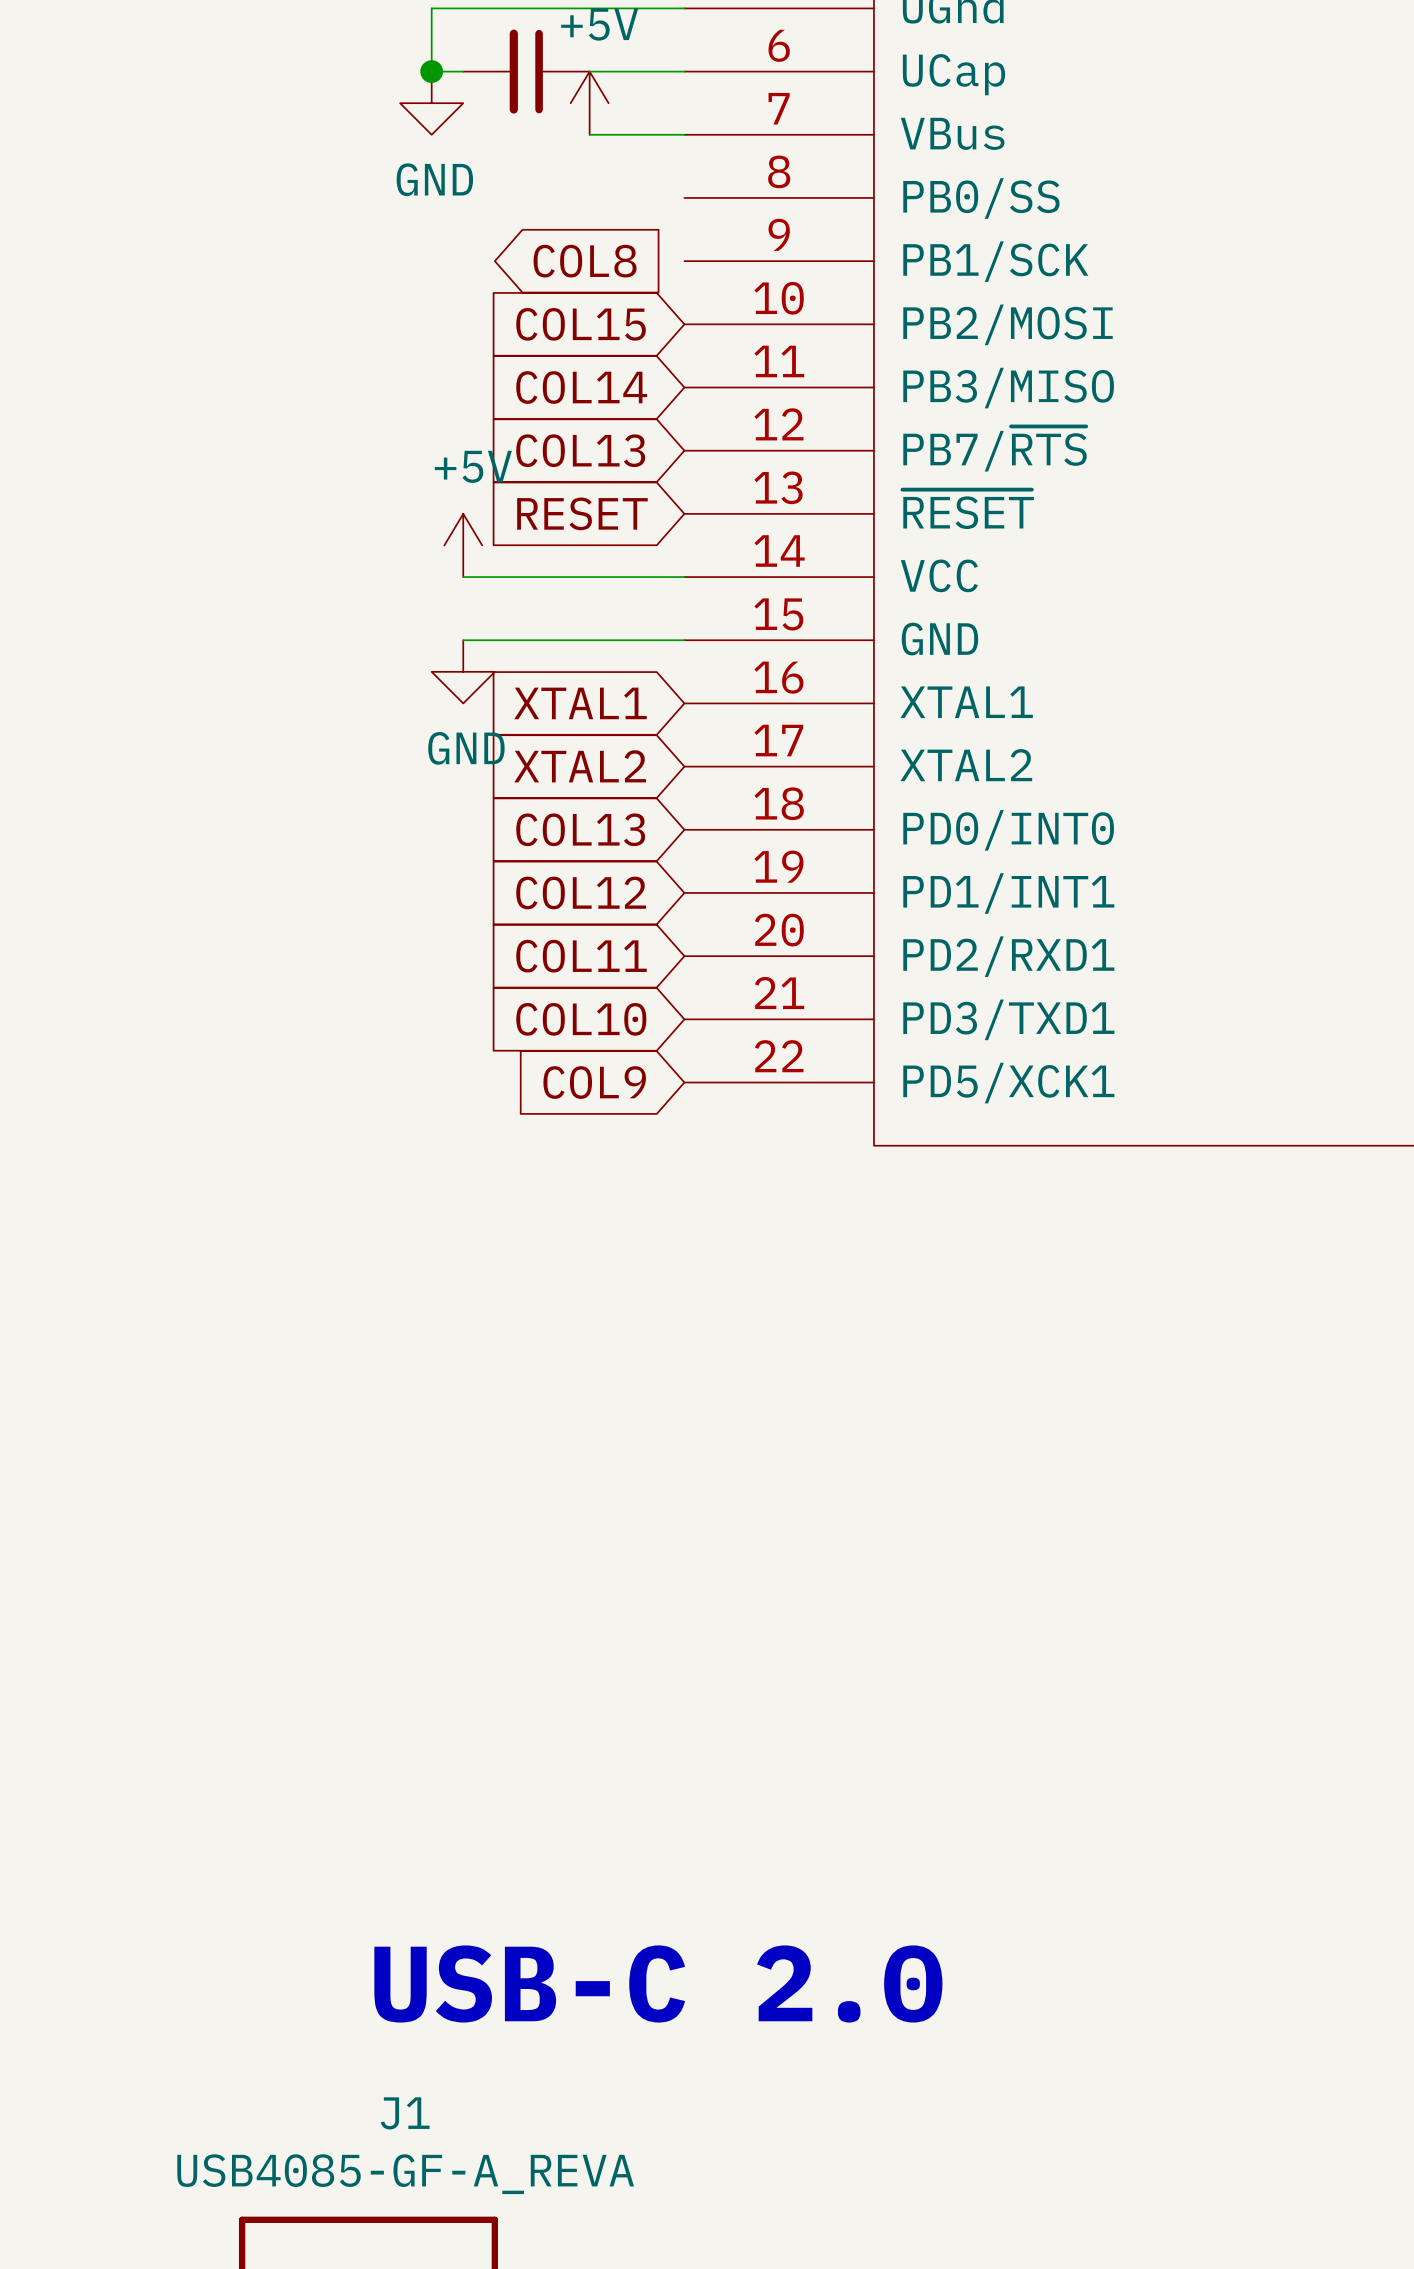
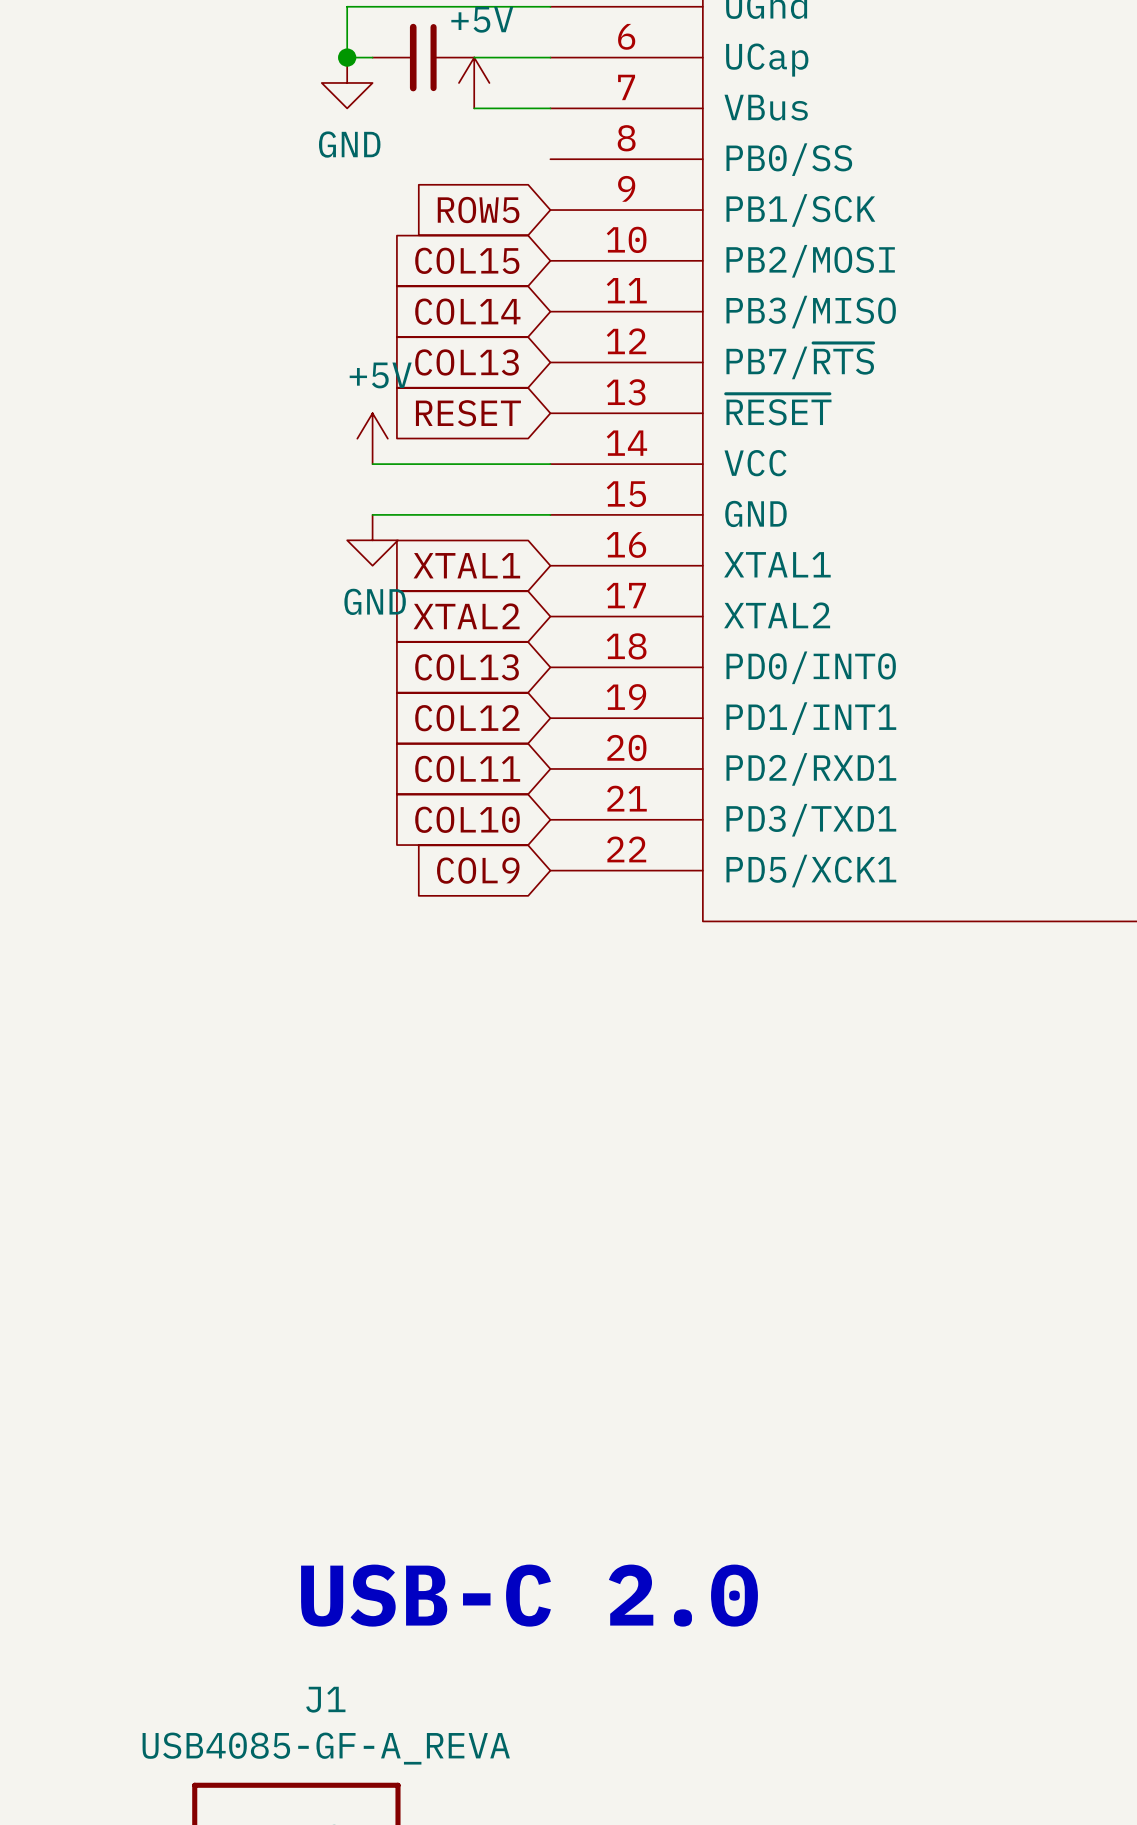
global label: COL8 (585, 261) -> none
global label: none -> ROW5 (478, 210)

